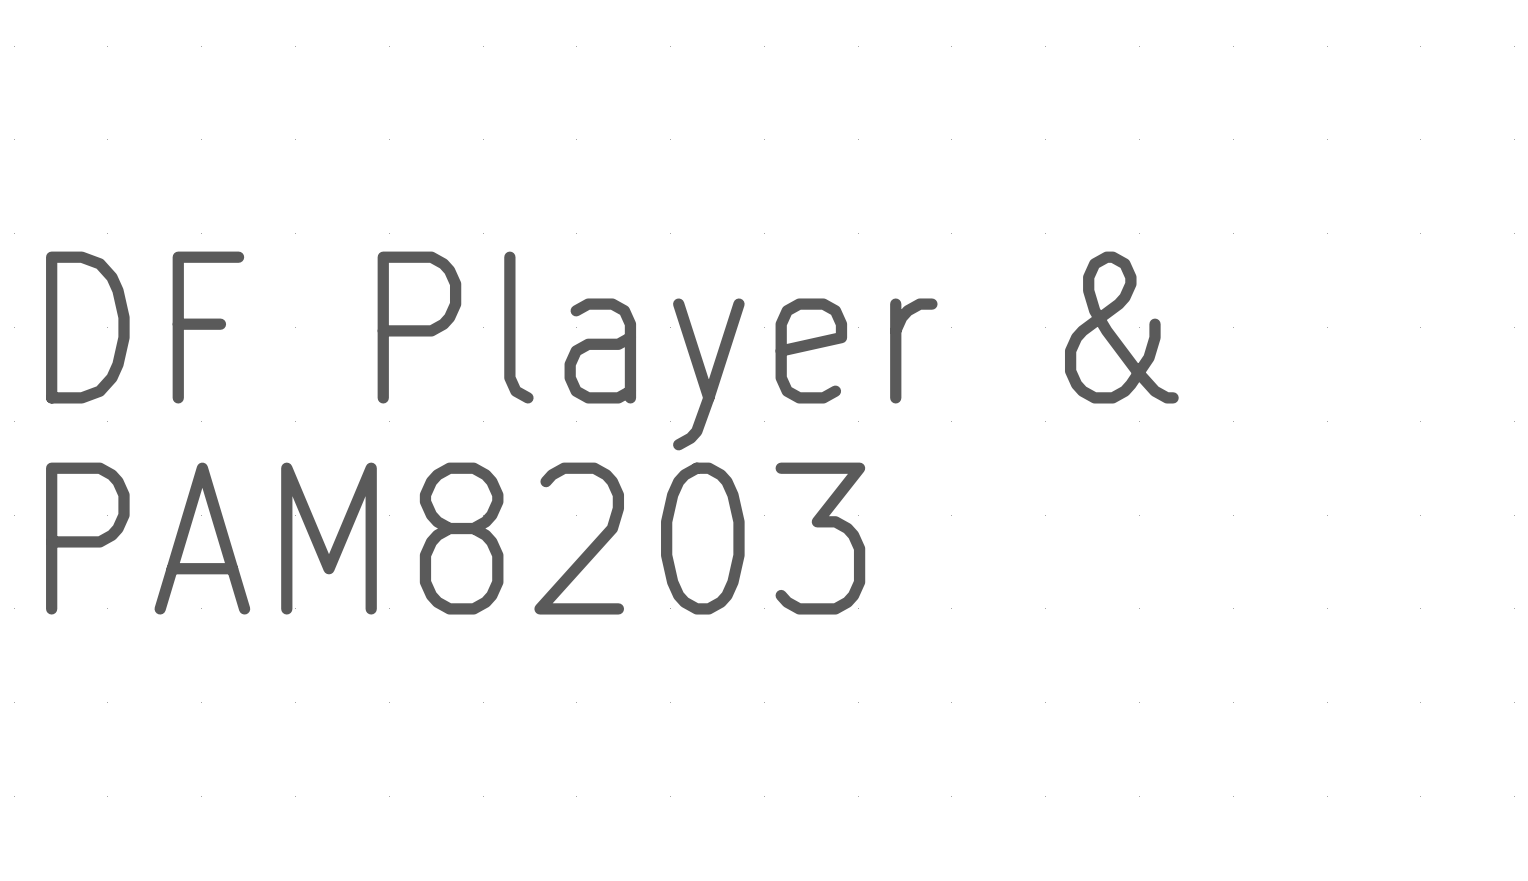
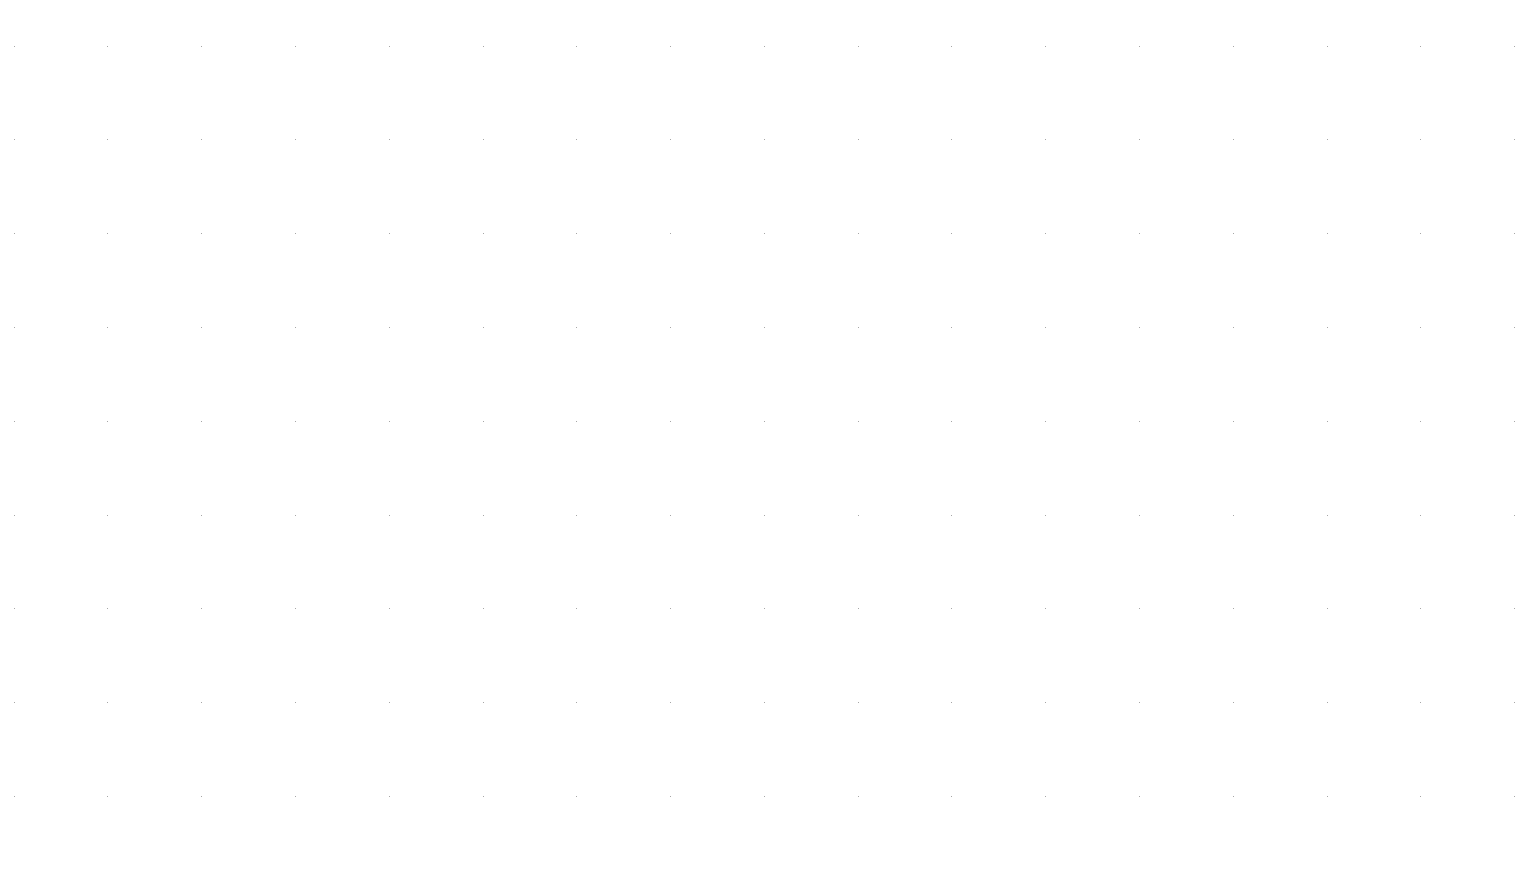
text: DF Player & (612, 350) -> none
text: PAM8203 (455, 538) -> none

